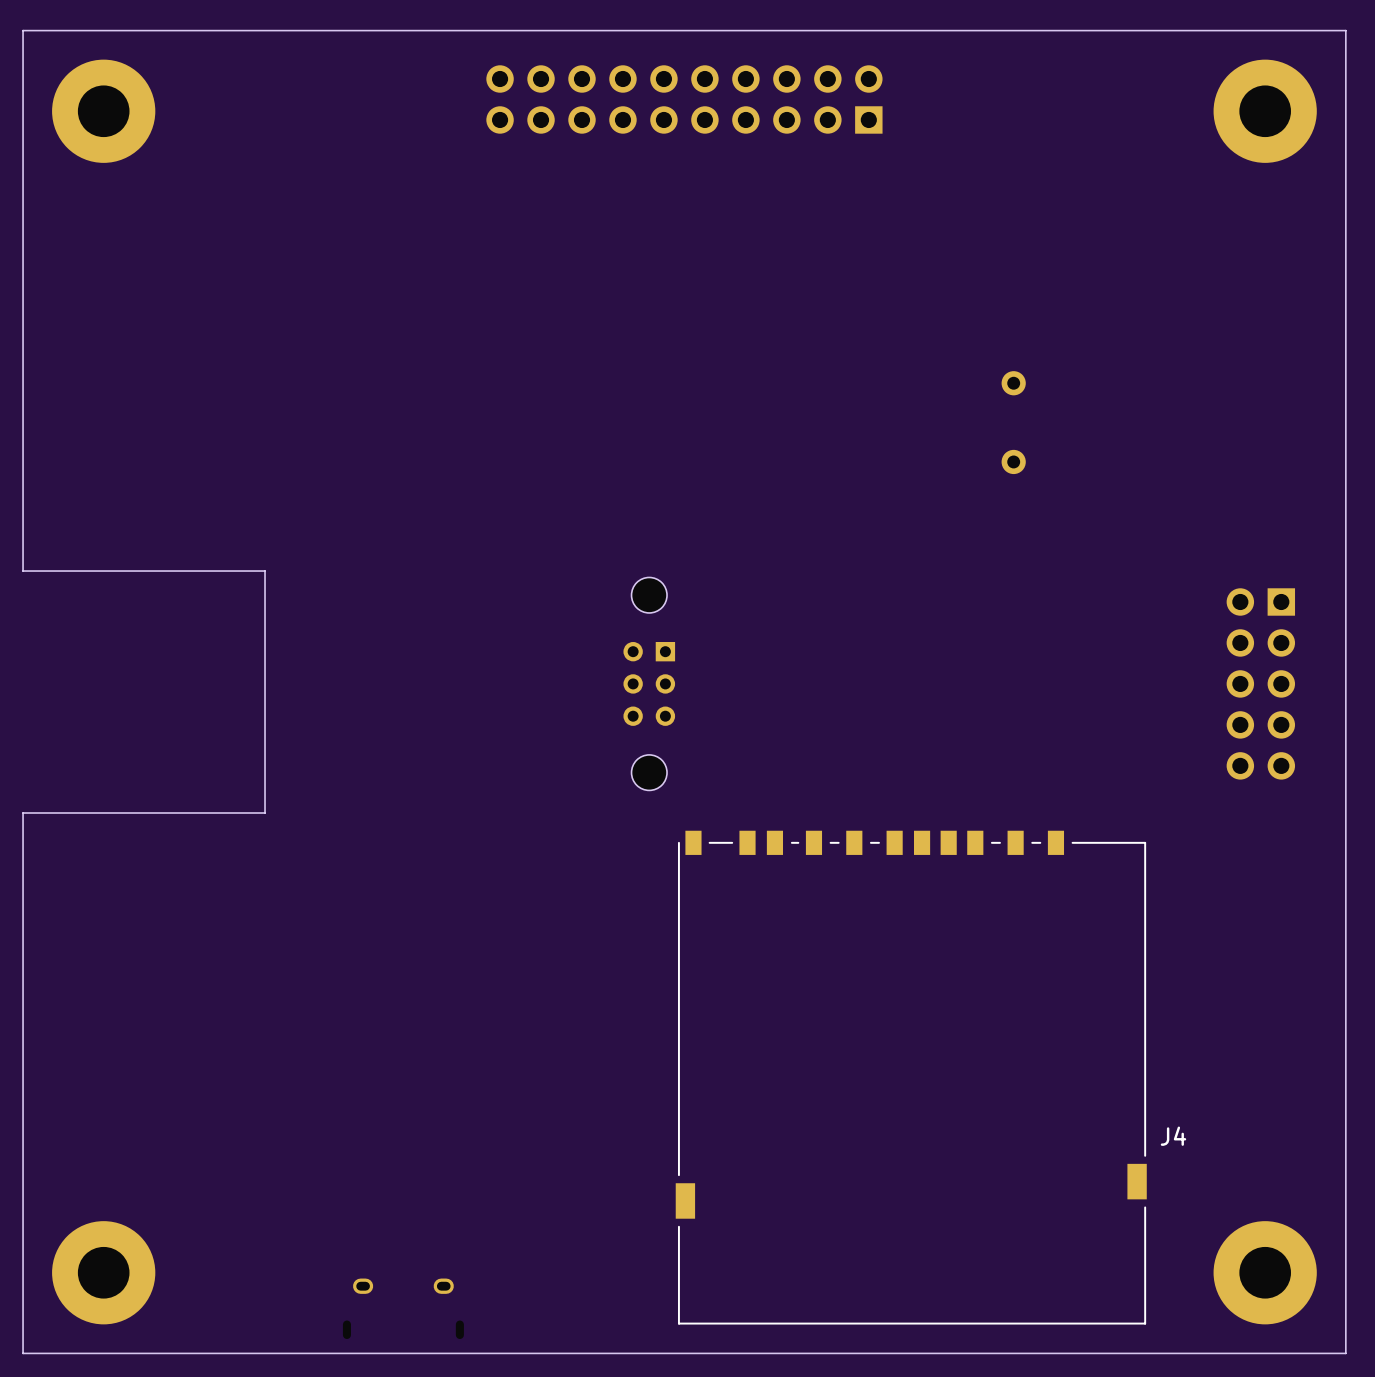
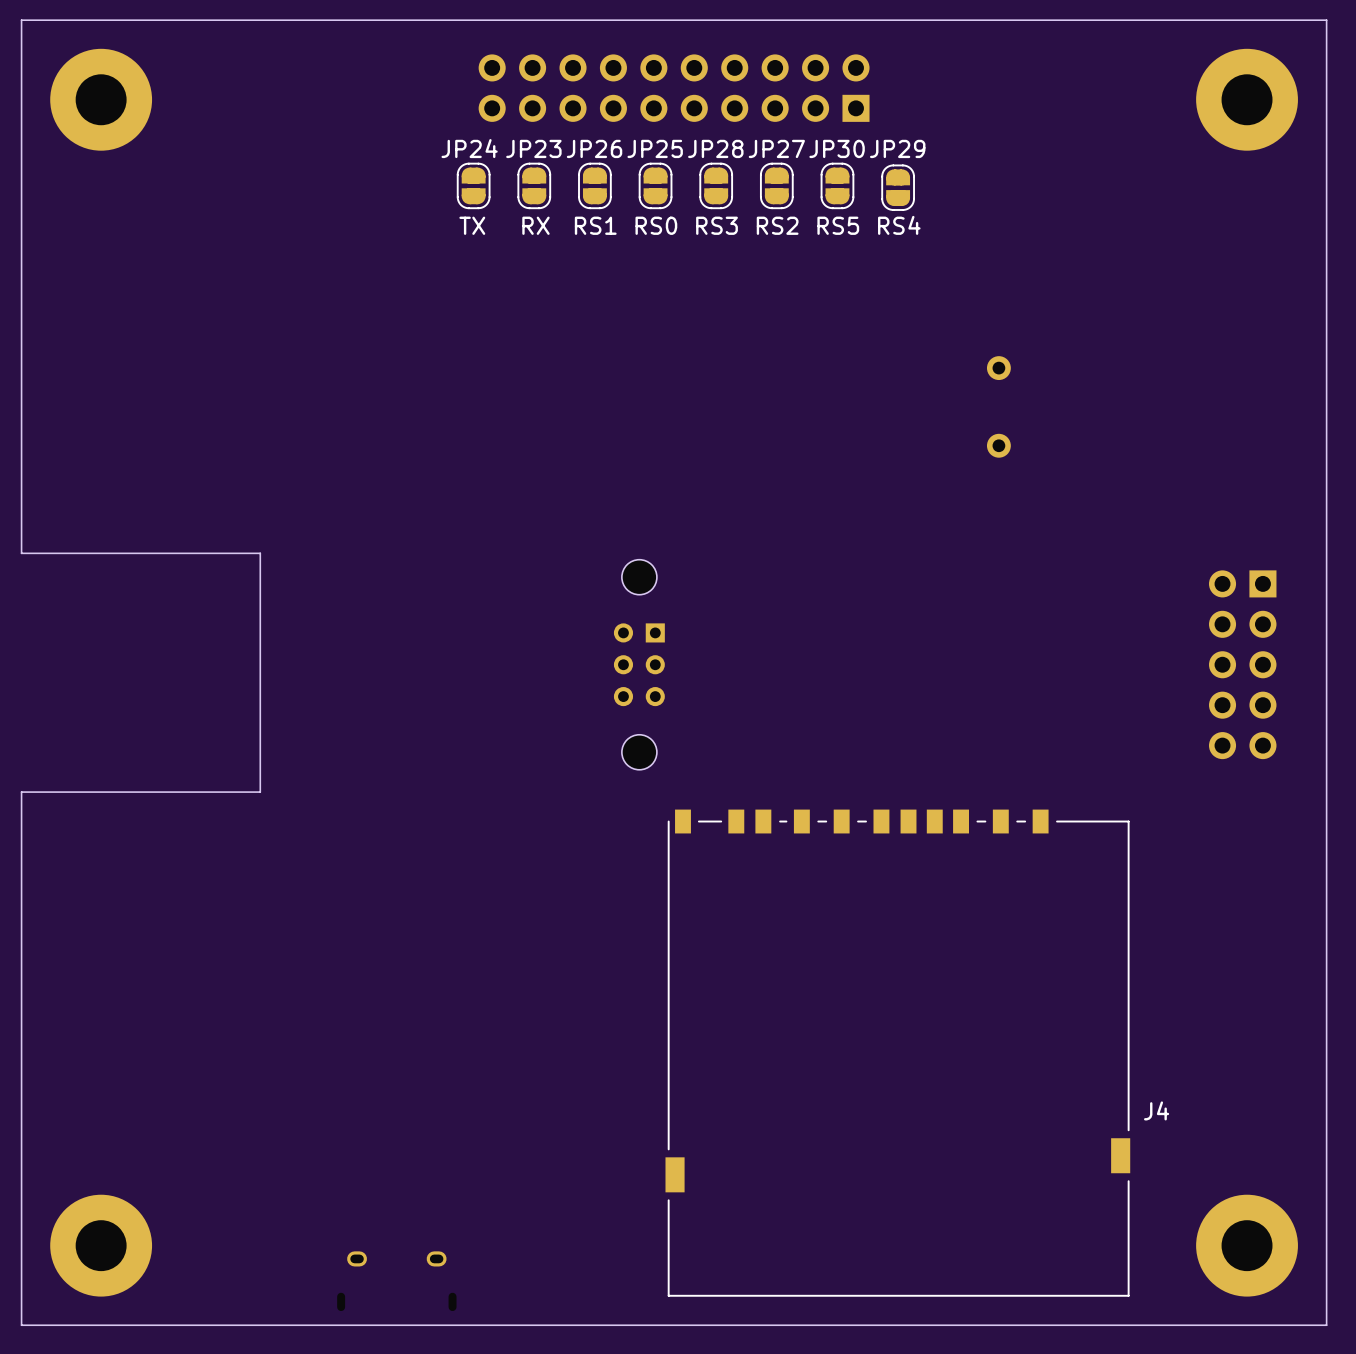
JP24: none -> (473, 185)
JP23: none -> (534, 185)
JP26: none -> (594, 185)
JP25: none -> (655, 185)
JP28: none -> (716, 185)
JP27: none -> (776, 185)
JP30: none -> (837, 185)
JP29: none -> (898, 187)
text: none -> TX (472, 225)
text: none -> RX (535, 225)
text: none -> RS1 (595, 225)
text: none -> RS0 (656, 225)
text: none -> RS3 (717, 225)
text: none -> RS2 (777, 225)
text: none -> RS5 (838, 225)
text: none -> RS4 (899, 225)

